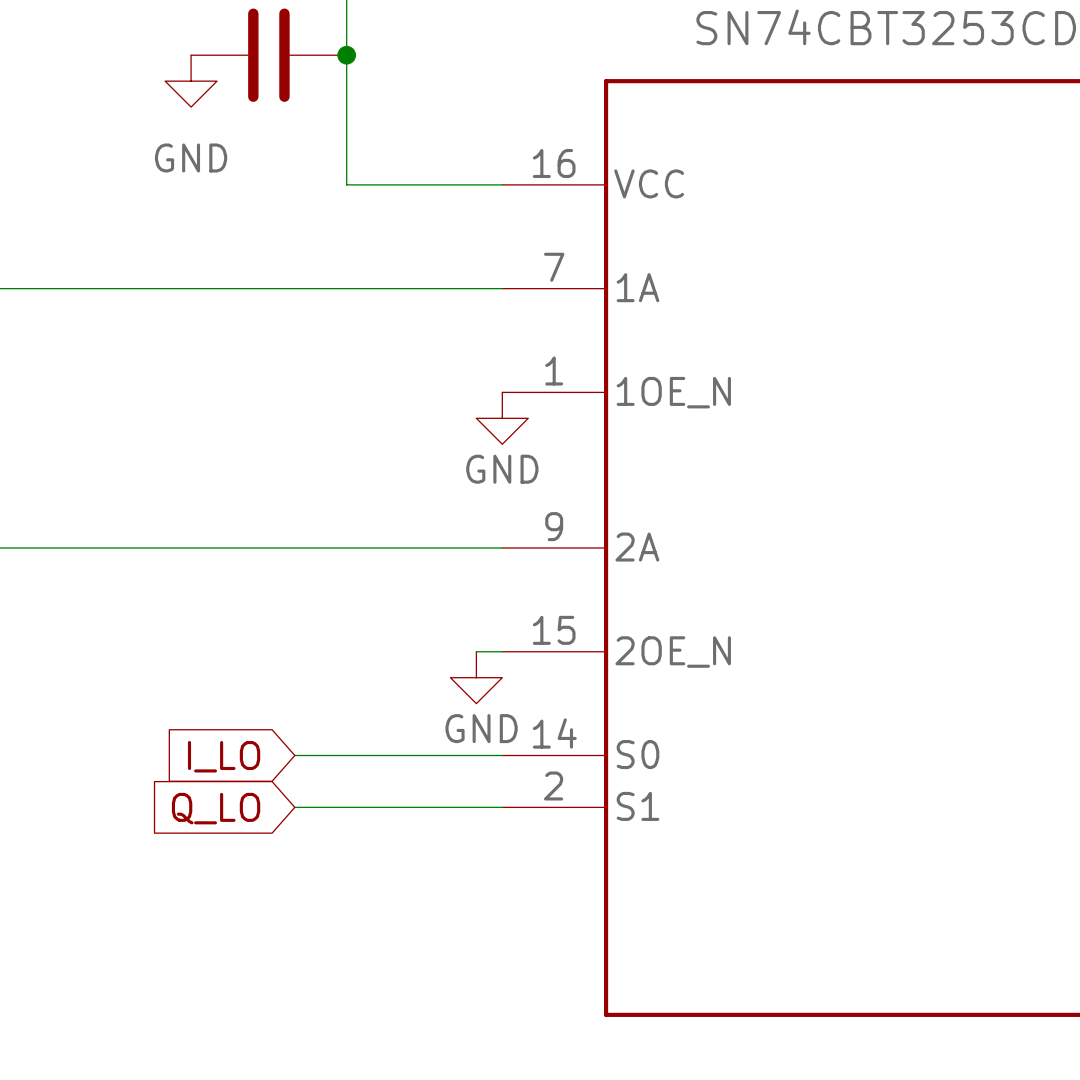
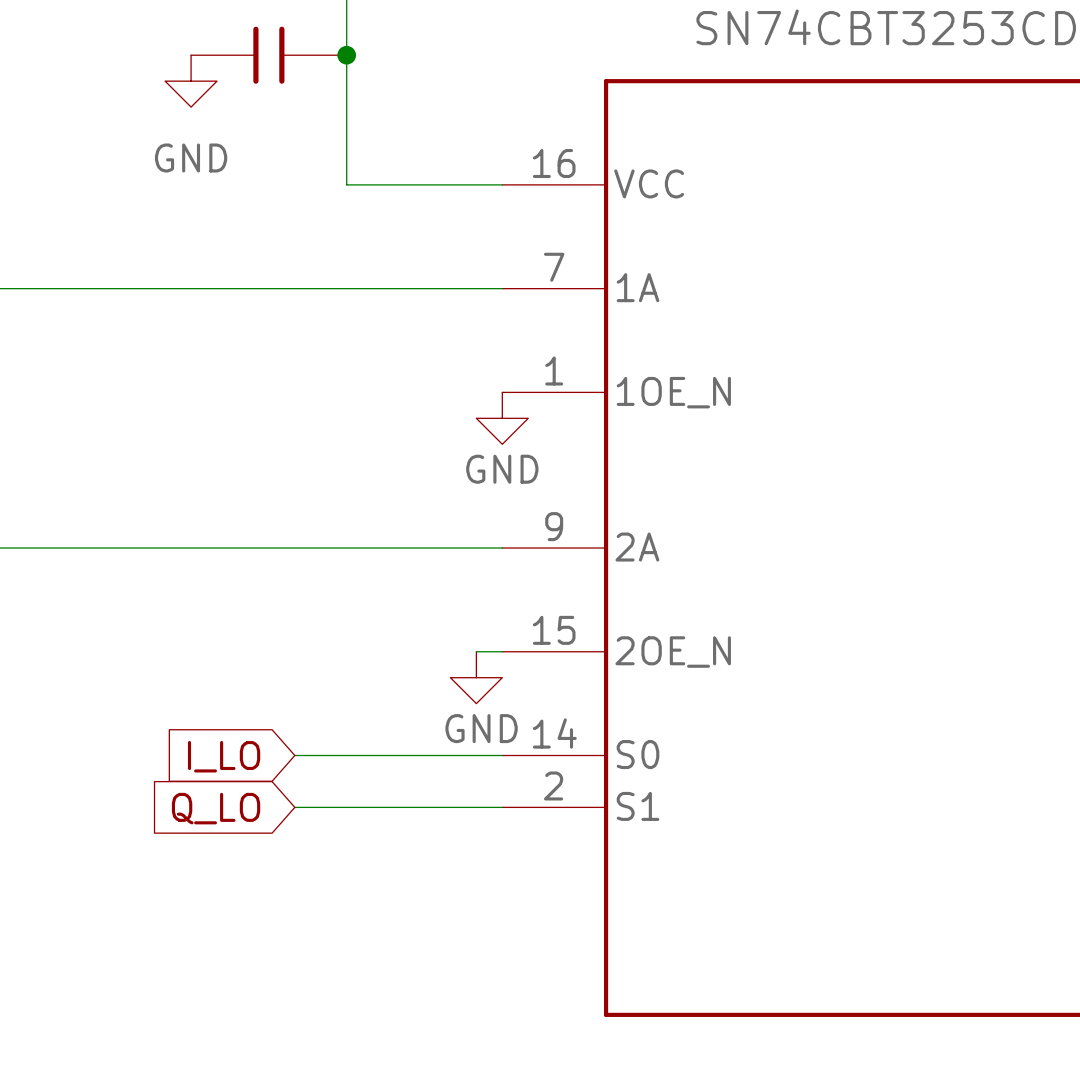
part symbol: [191, 8, 347, 102] -> [191, 26, 347, 84]

